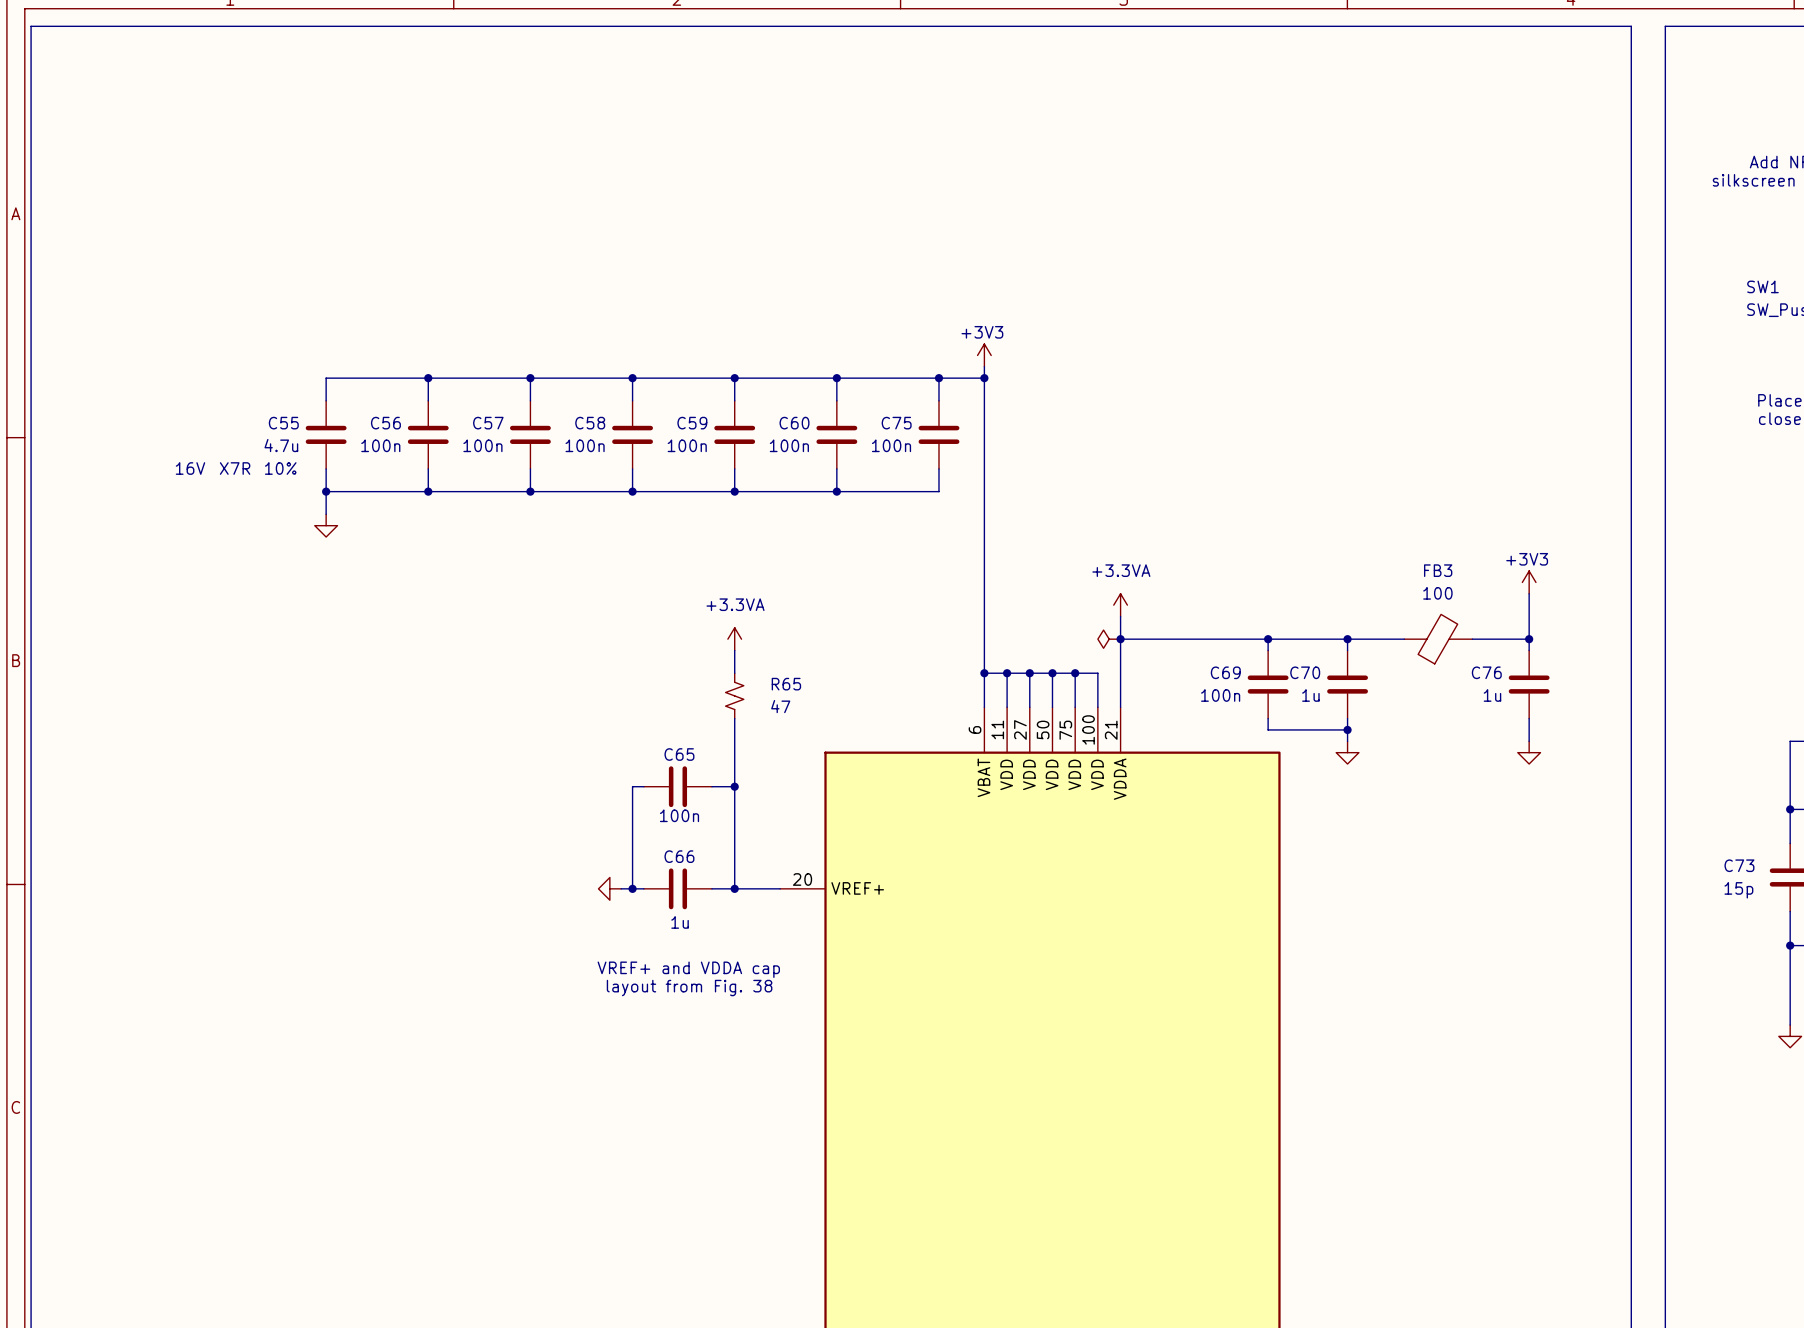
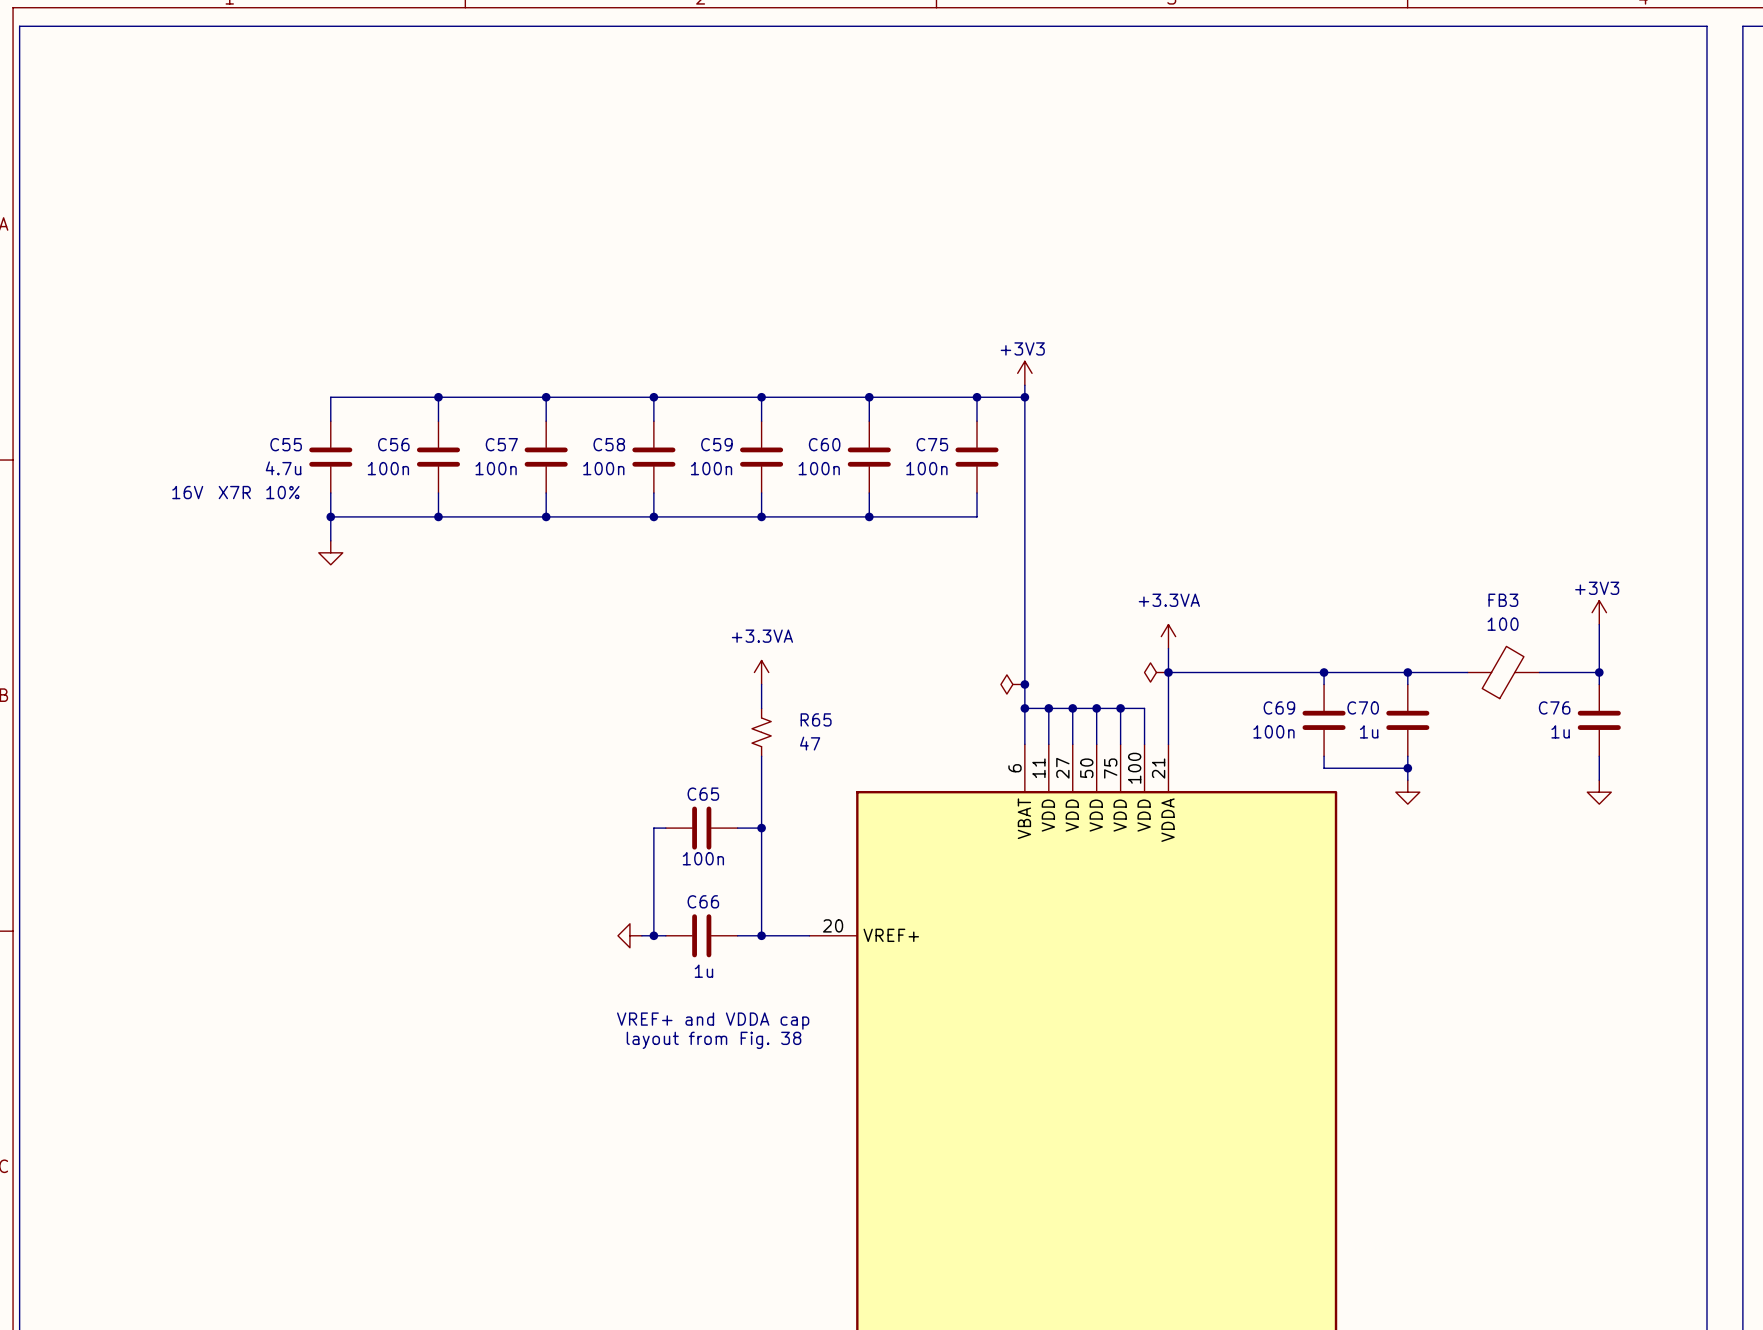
power symbol: none -> (1012, 684)
junction: none -> (1024, 684)

